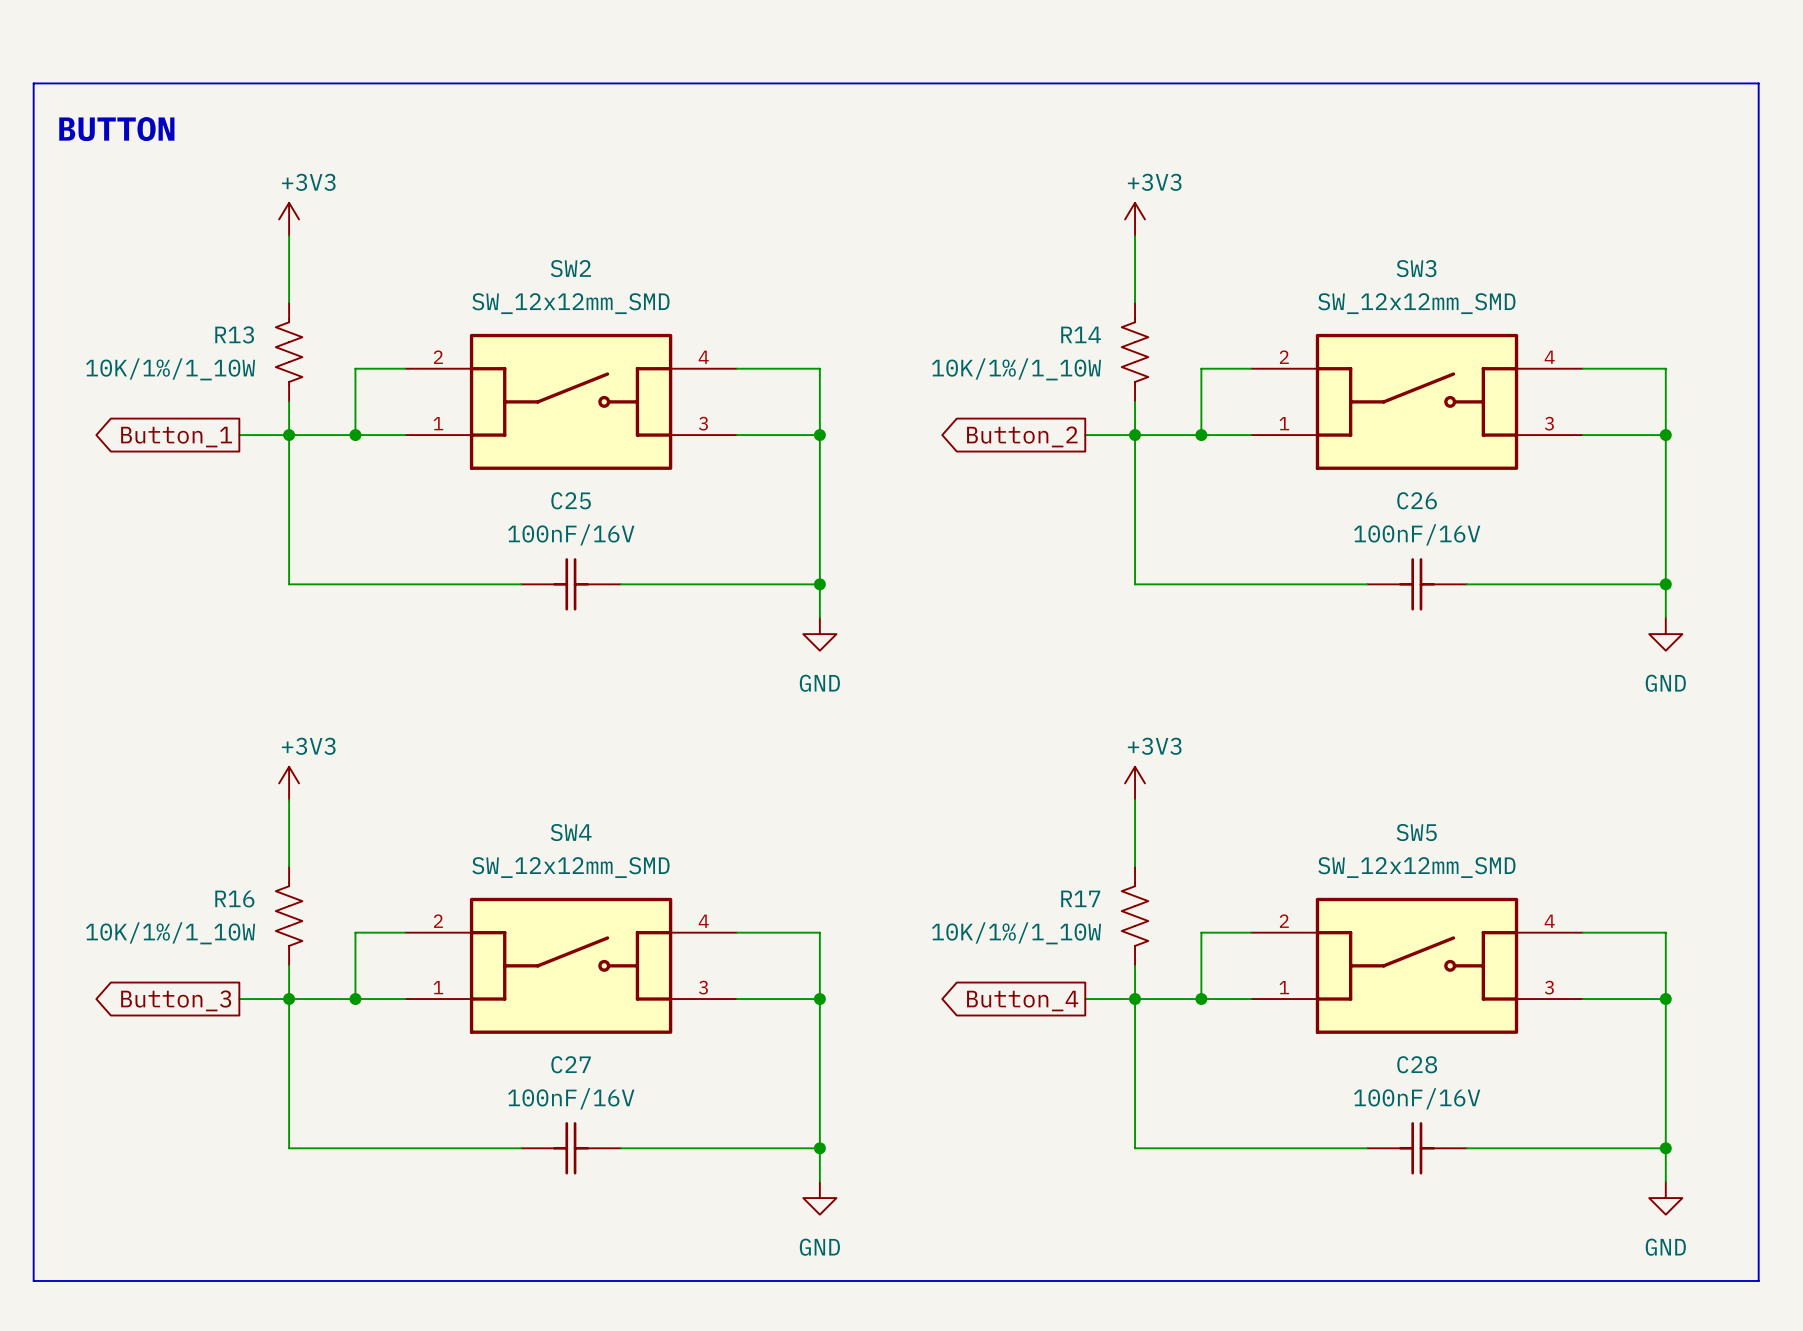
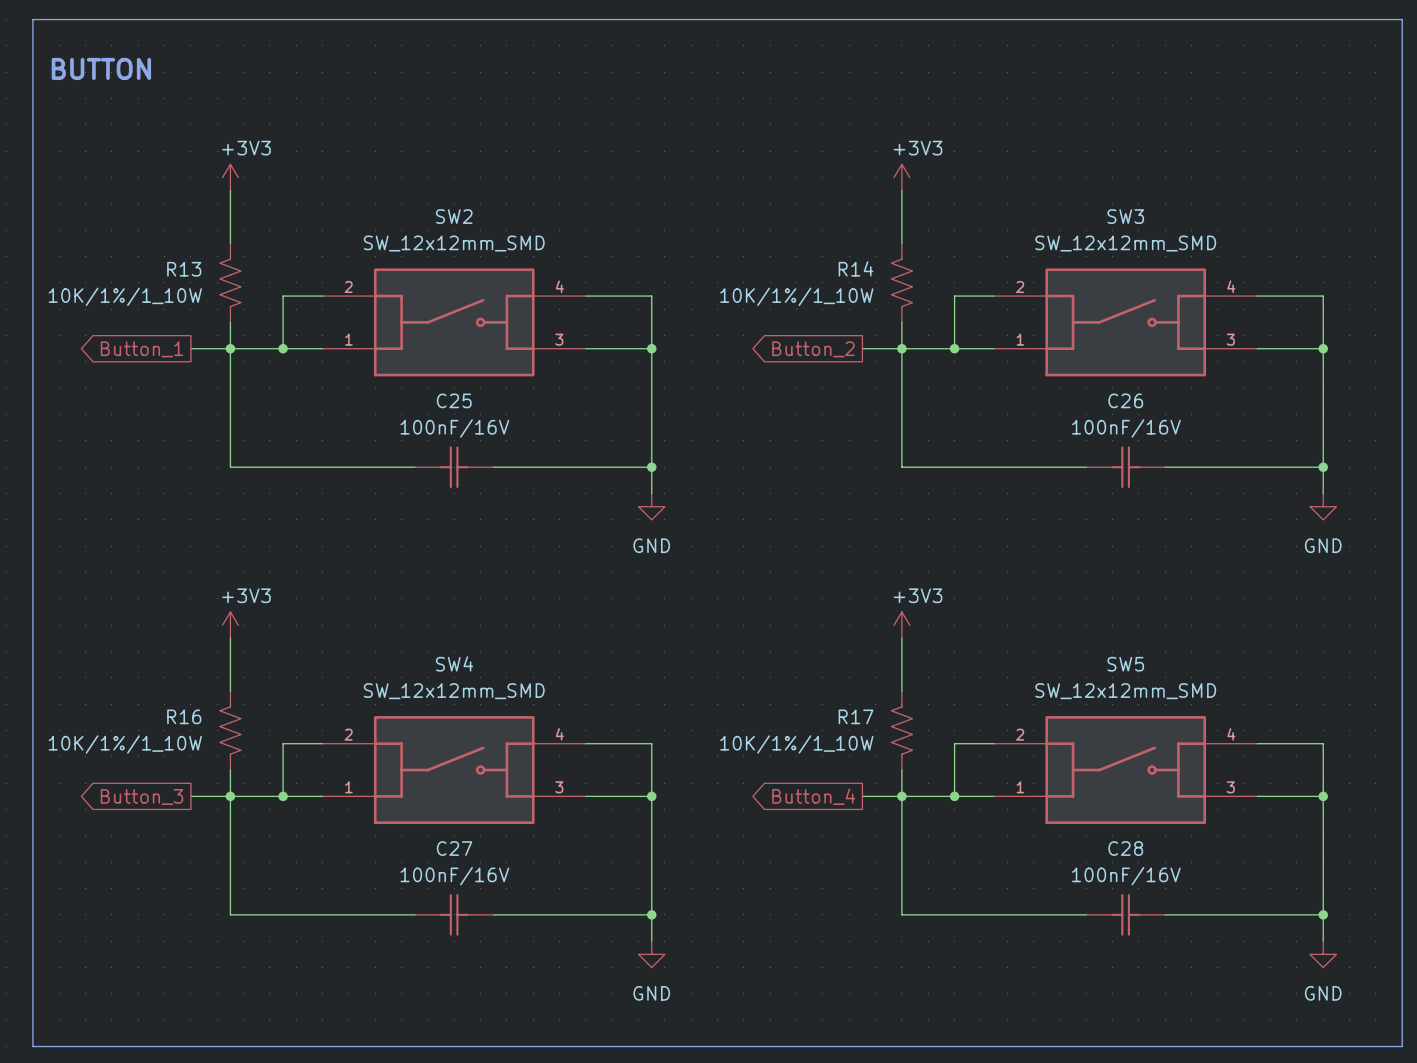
line: (33, 83) (1758, 83) (1758, 1280) (33, 1280) (33, 83) -> (32, 19) (32, 1046) (1402, 1046) (1402, 19) (32, 19)
text position: BUTTON (116, 129) -> BUTTON (101, 68)

